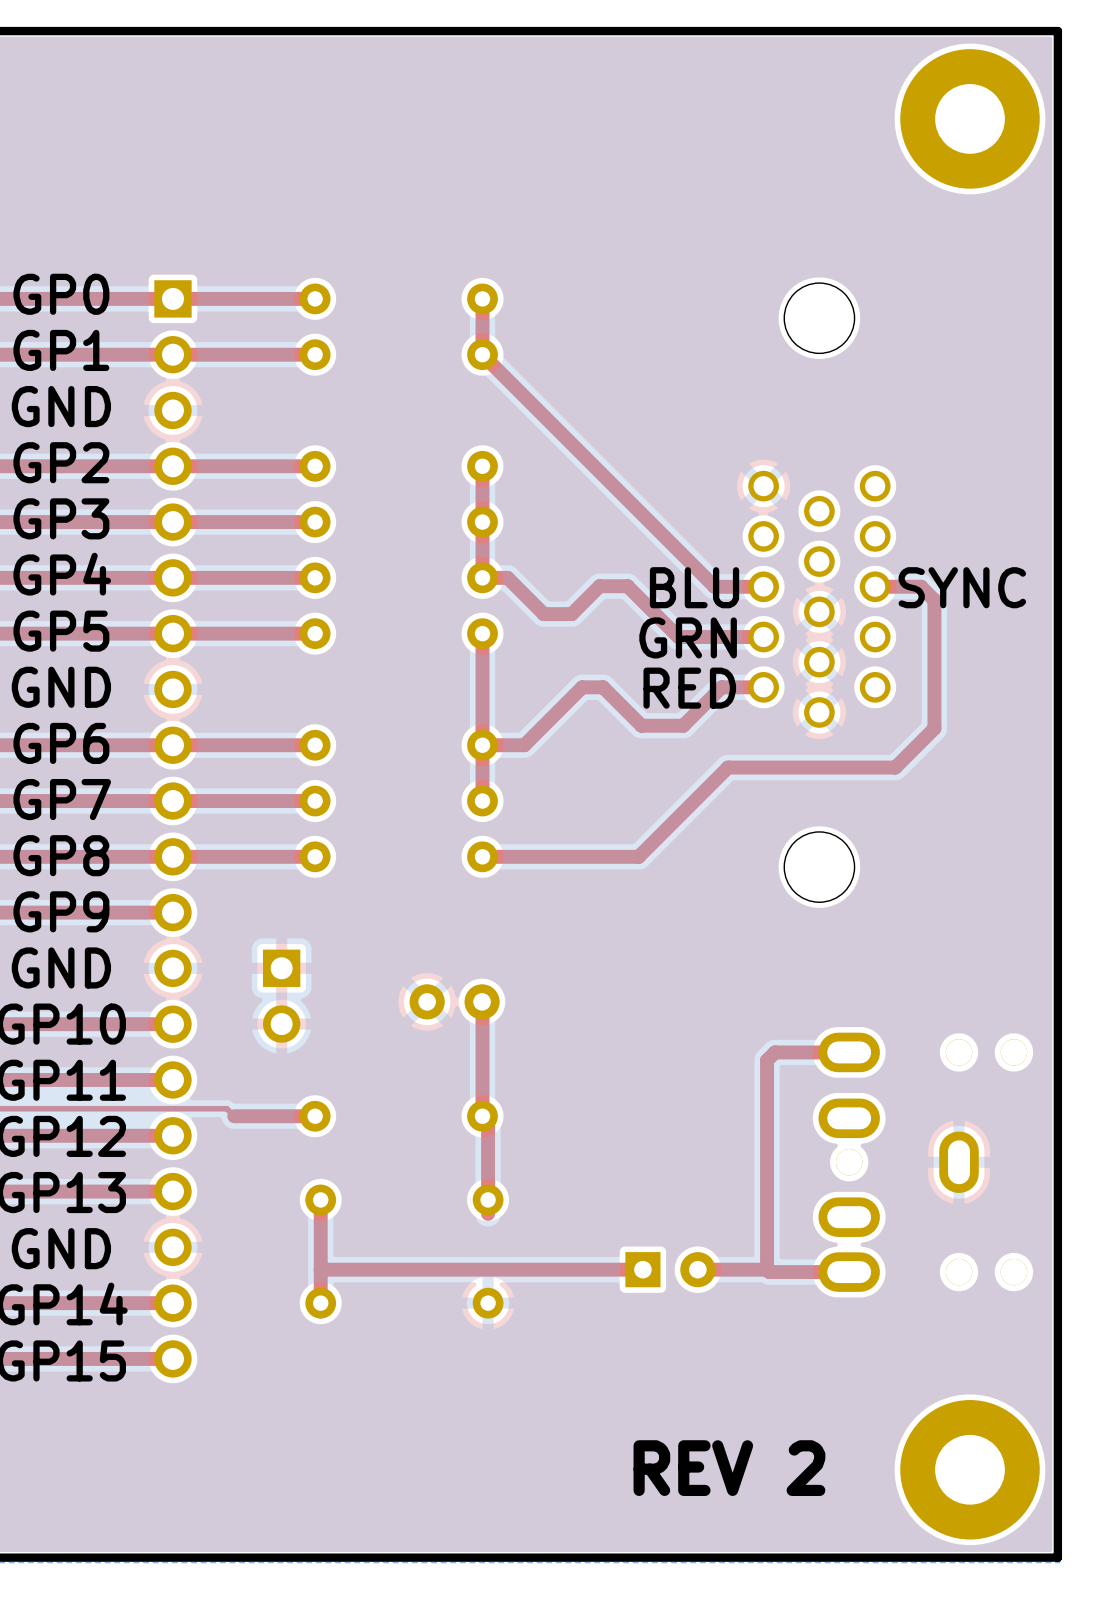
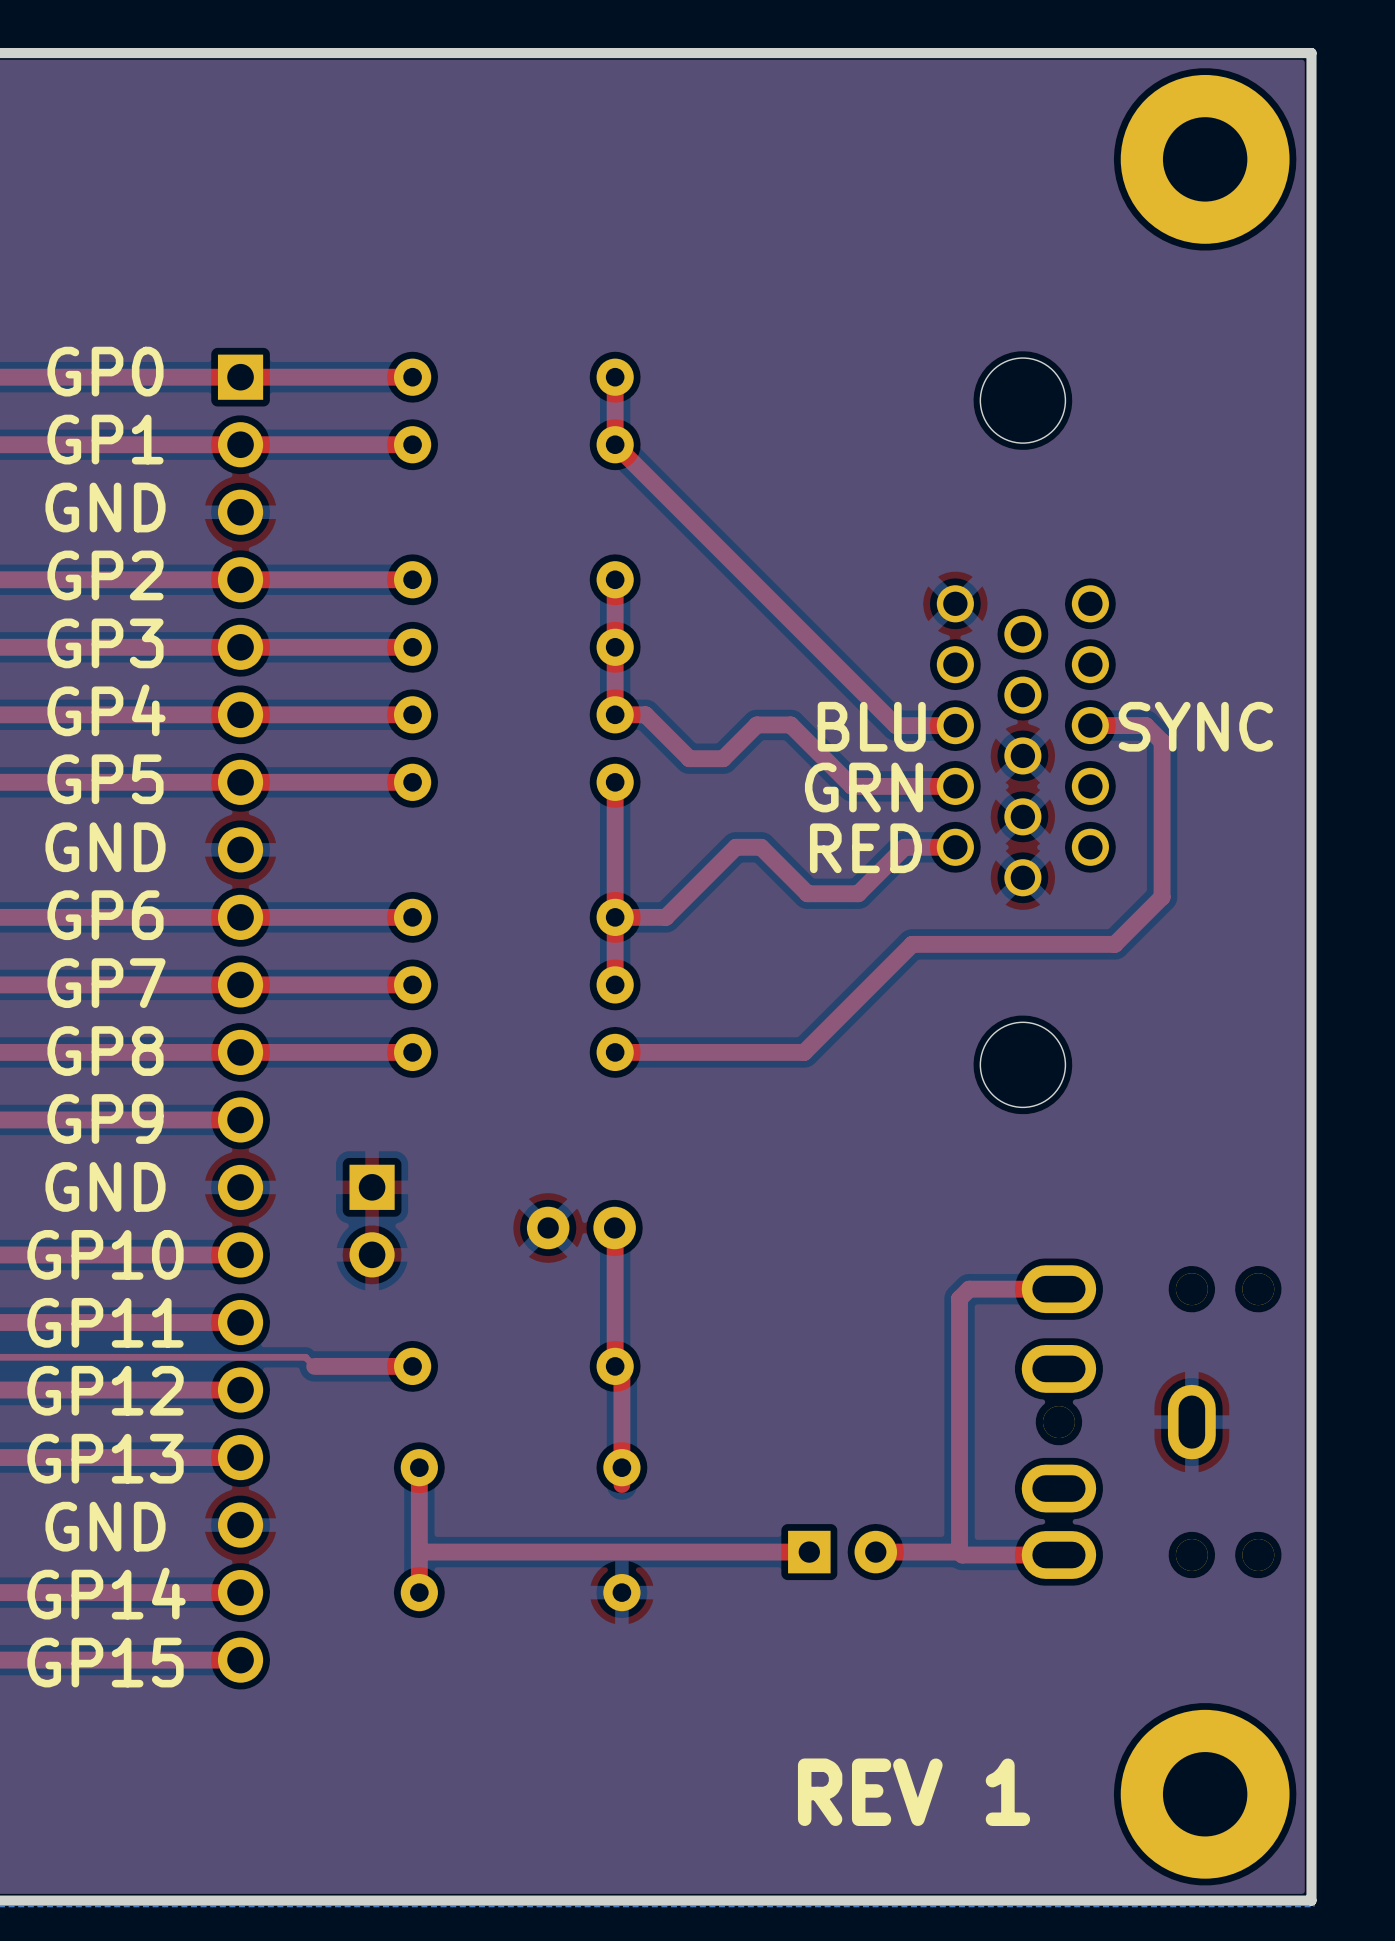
text: REV 2 (729, 1468) -> REV 1 (914, 1792)

